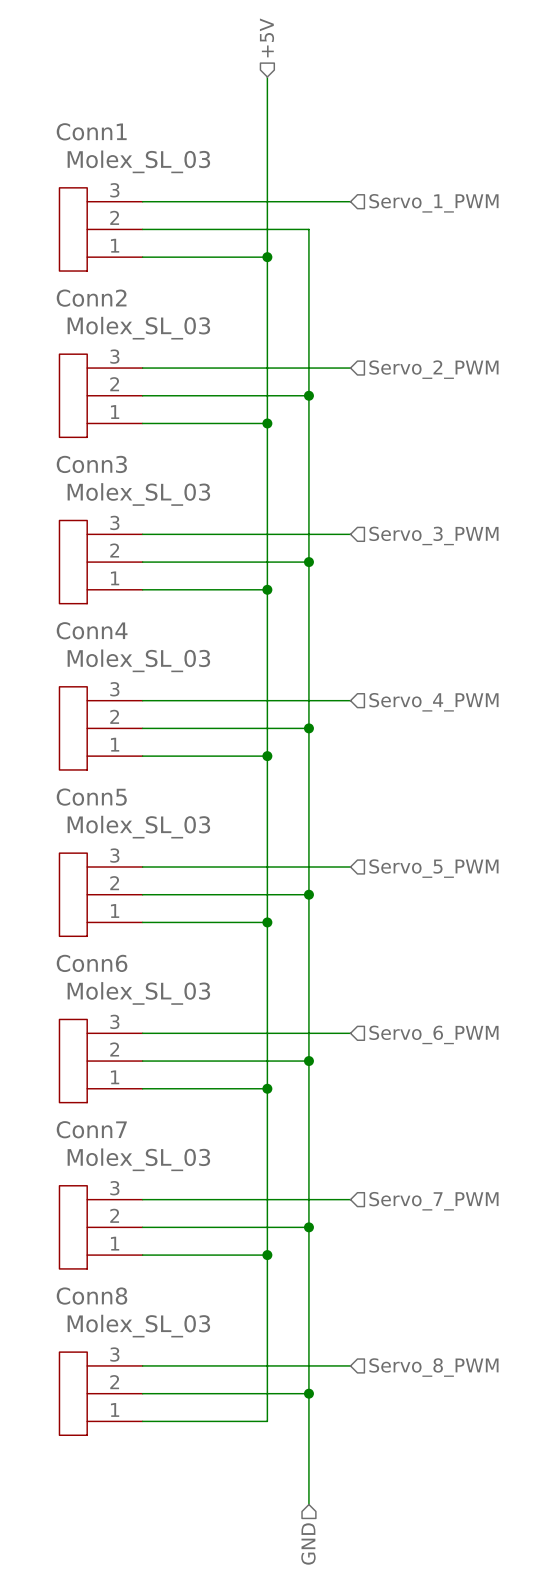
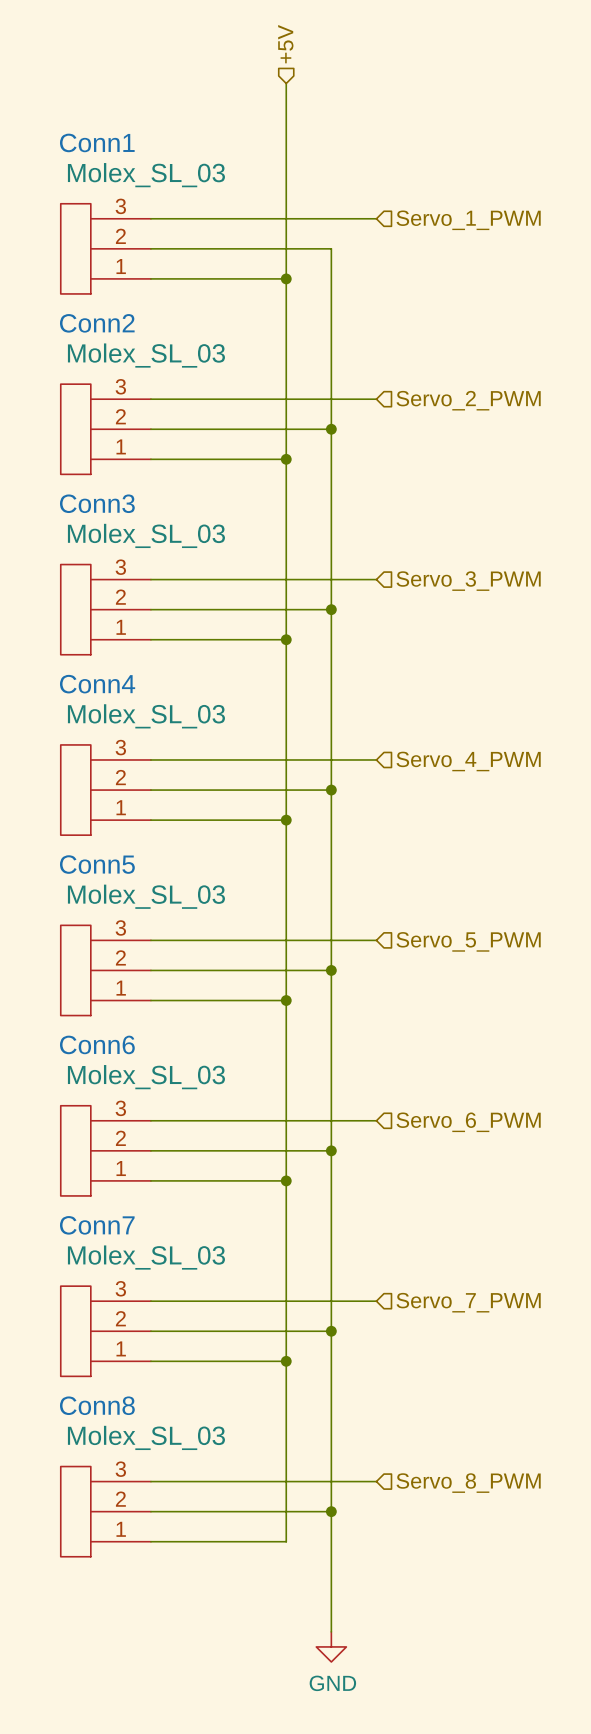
power symbol: none -> GND (331, 1646)
hierarchical label: GND (308, 1543) -> none

